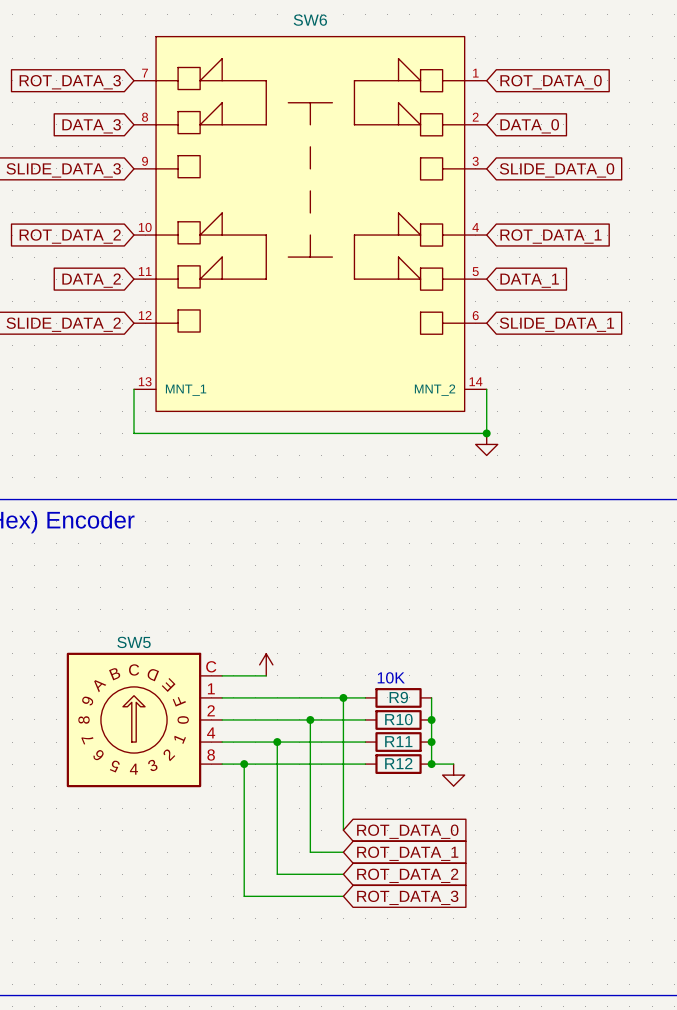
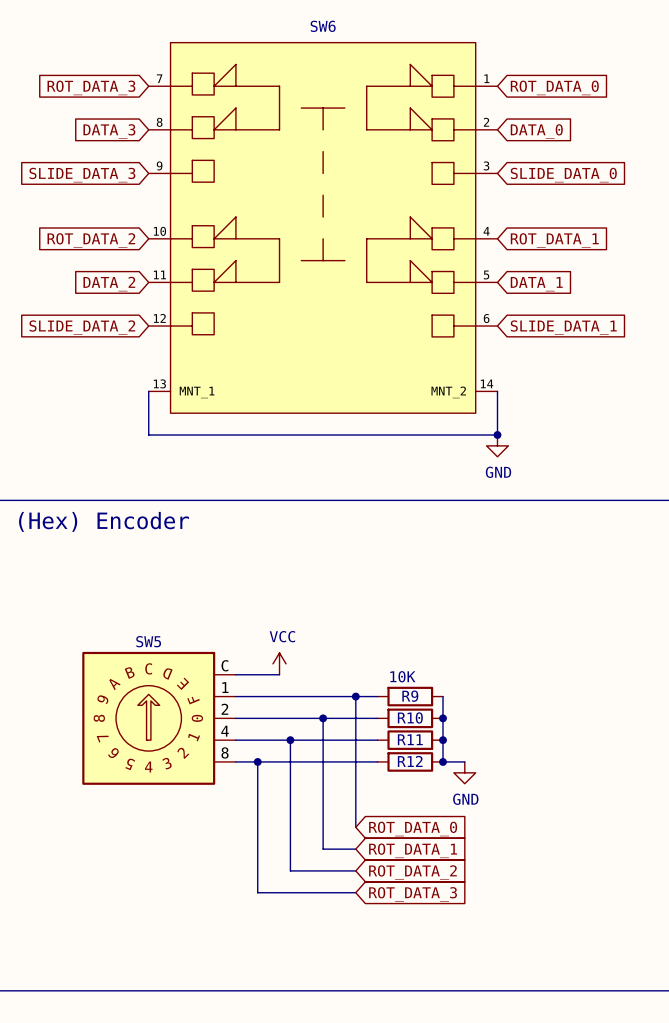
power symbol text: none -> GND (498, 472)
power symbol text: none -> VCC (282, 636)
power symbol text: none -> GND (465, 799)

